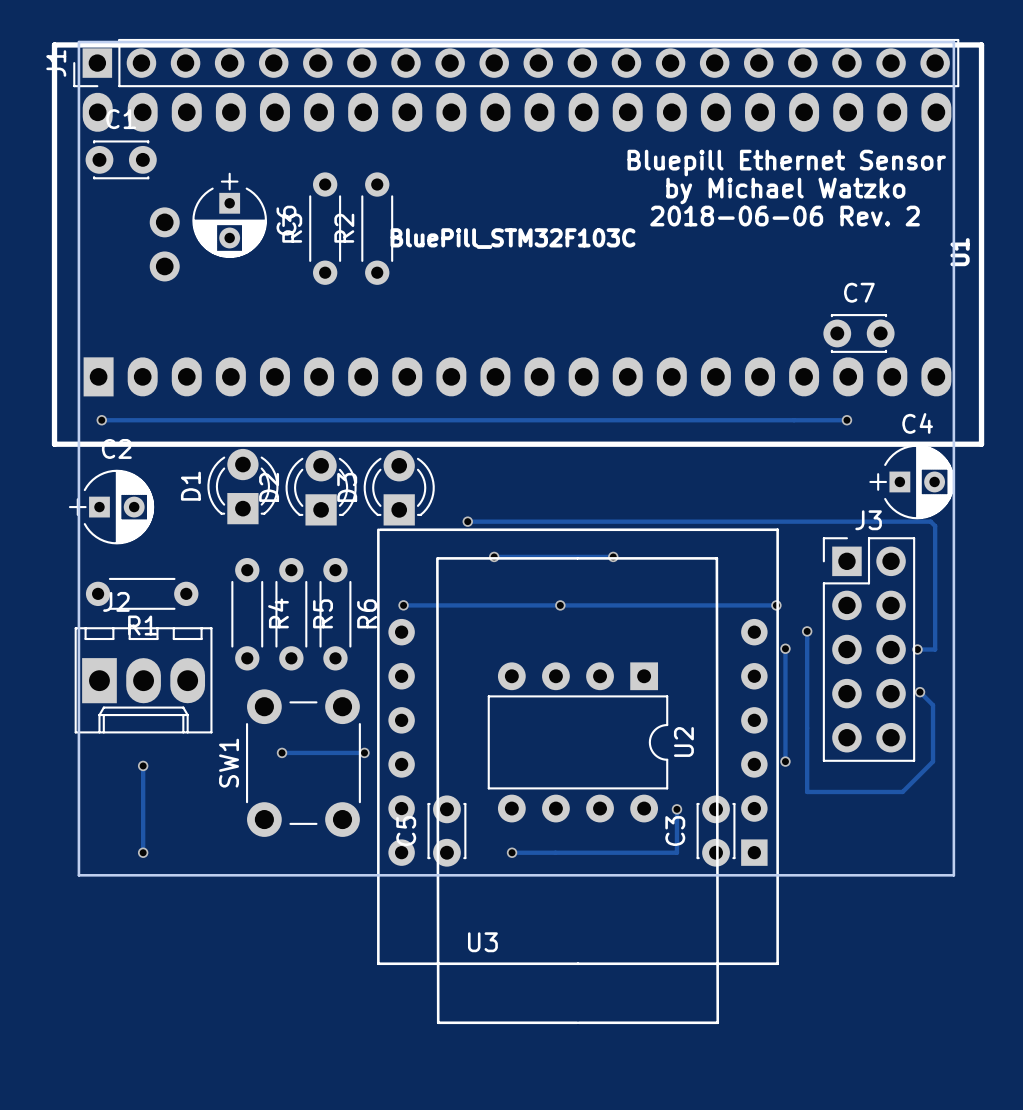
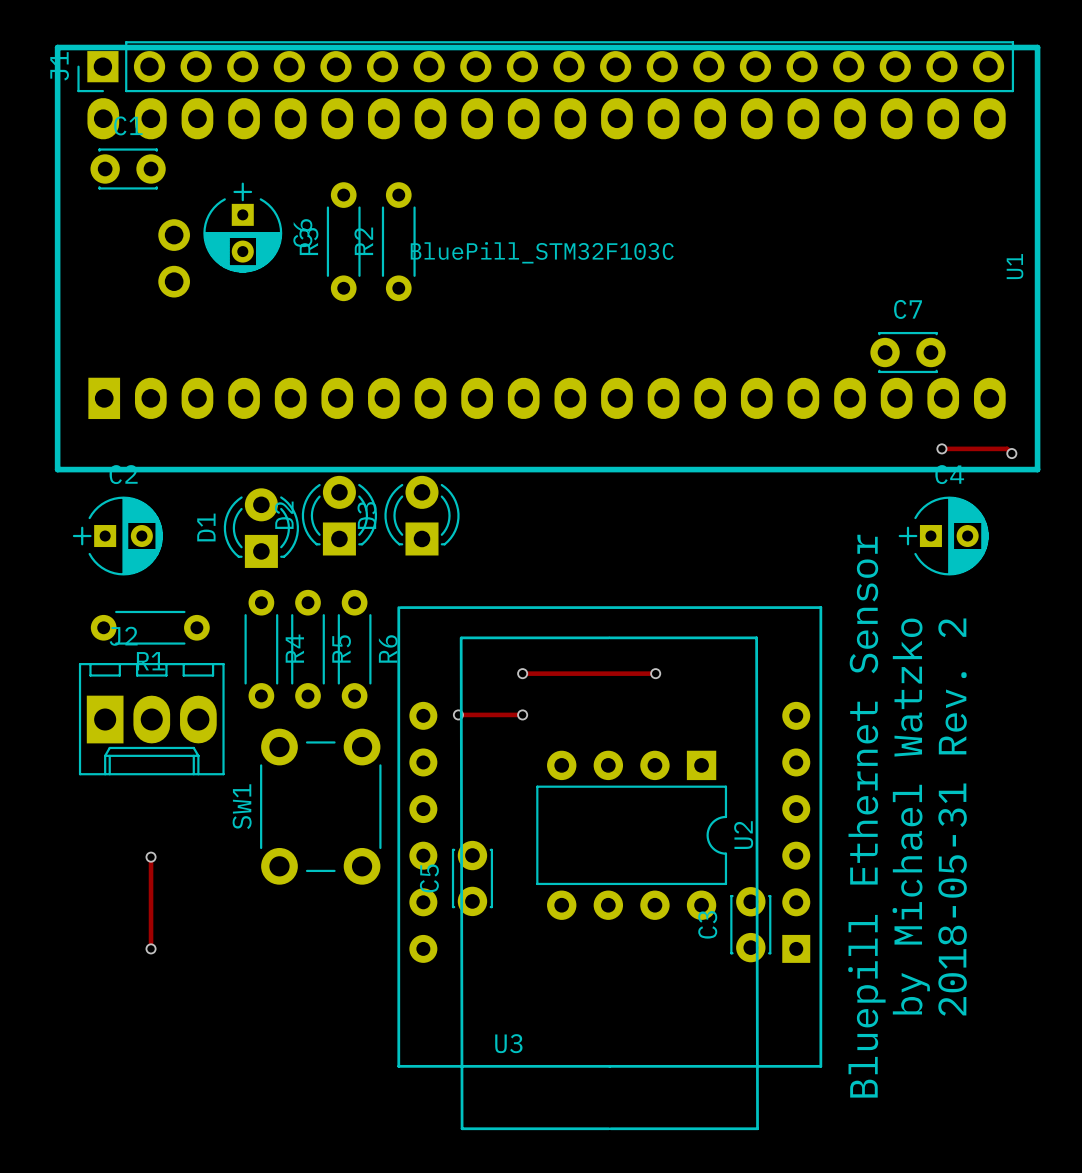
board edge: (78, 42) (953, 42) (953, 875) (78, 875) (78, 42) -> none
text: Bluepill Ethernet Sensor (786, 163) -> none
text: by Michael Watzko (785, 190) -> none
text: 2018-06-06 Rev. 2 (785, 216) -> none
track: (101, 420) (846, 420) -> none
via: (101, 420) -> none
via position: (846, 420) -> (941, 448)
track: none -> (941, 448) (1007, 448) (1011, 453)
via: none -> (1011, 453)
C4 position: (911, 481) -> (943, 536)
D1 position: (242, 486) -> (261, 528)
track: (467, 521) (930, 521) (935, 526) (935, 649) (917, 649) -> none
via: (467, 521) -> none
track: (494, 556) (613, 556) -> none
via: (494, 556) -> none
via: (613, 556) -> none
track: (403, 605) (776, 605) -> none
via: (403, 605) -> none
via: (560, 605) -> none
via: (776, 605) -> none
track: (807, 631) (807, 791) (902, 791) (933, 761) (933, 705) (920, 692) -> none
via: (807, 631) -> none
track: none -> (522, 673) (655, 673)
via: none -> (522, 673)
via: none -> (655, 673)
track: (785, 648) (785, 761) -> none
via: (785, 648) -> none
J3: (869, 649) -> none
via: (917, 649) -> none
track: none -> (458, 714) (522, 714)
via: none -> (458, 714)
via: none -> (522, 714)
via: (920, 692) -> none
U2 position: (577, 742) -> (631, 835)
track: (282, 752) (364, 752) -> none
via: (282, 752) -> none
via: (364, 752) -> none
via: (785, 761) -> none
track: (143, 765) (143, 852) -> (151, 857) (151, 948)
via: (143, 765) -> none
text: none -> Bluepill Ethernet Sensor (866, 816)
text: none -> by Michael Watzko (911, 816)
text: none -> 2018-05-31 Rev. 2 (952, 817)
U3 position: (577, 776) -> (609, 868)
track: (676, 809) (676, 852) (512, 852) -> none
via: (676, 809) -> none
via: none -> (151, 857)
C3 position: (716, 831) -> (750, 924)
via: (143, 852) -> none
via: (512, 852) -> none
via: none -> (151, 948)

